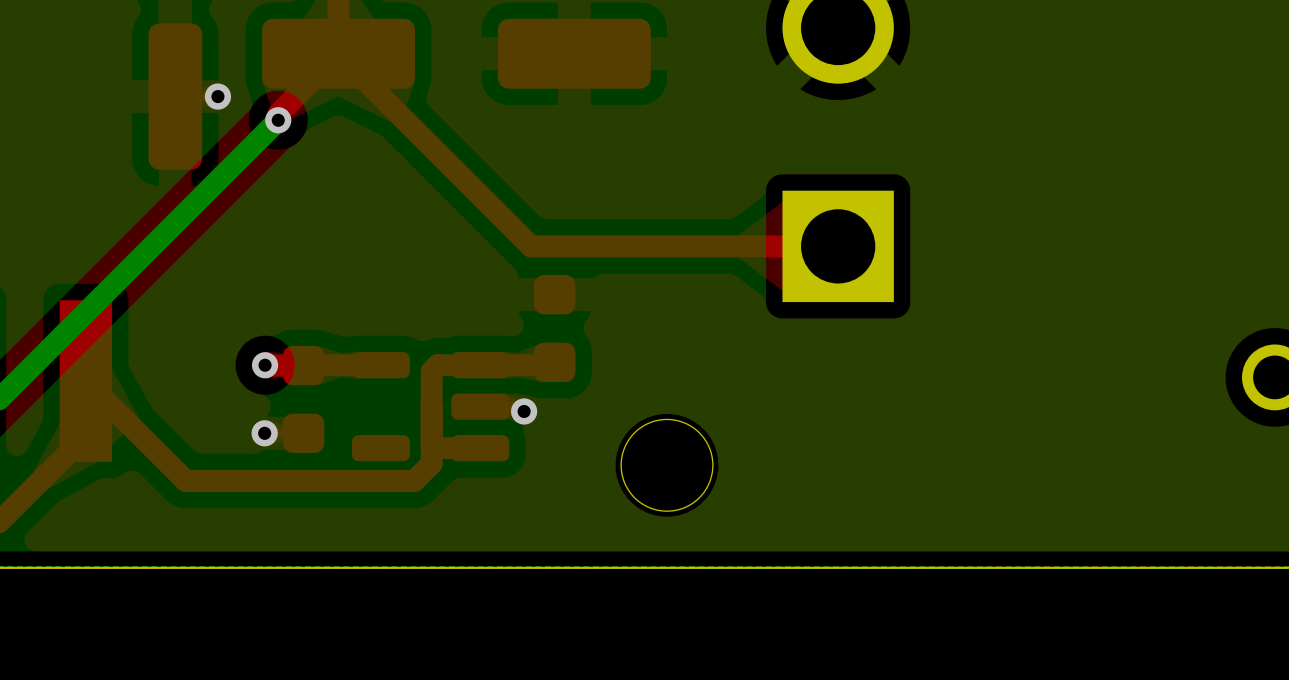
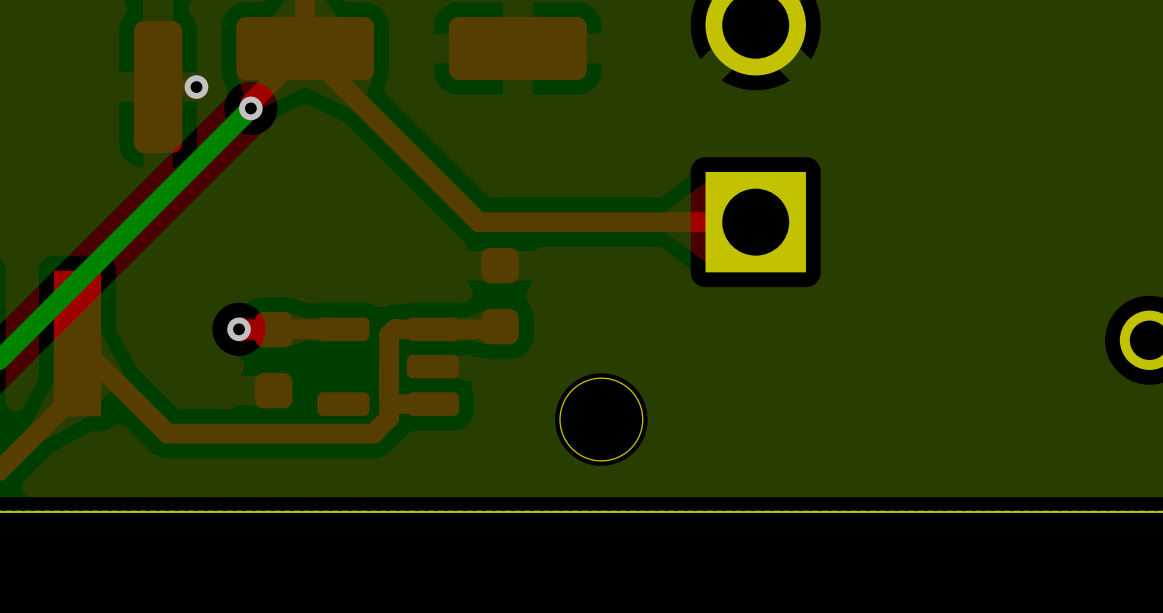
via: (524, 411) -> none
via: (264, 433) -> none

